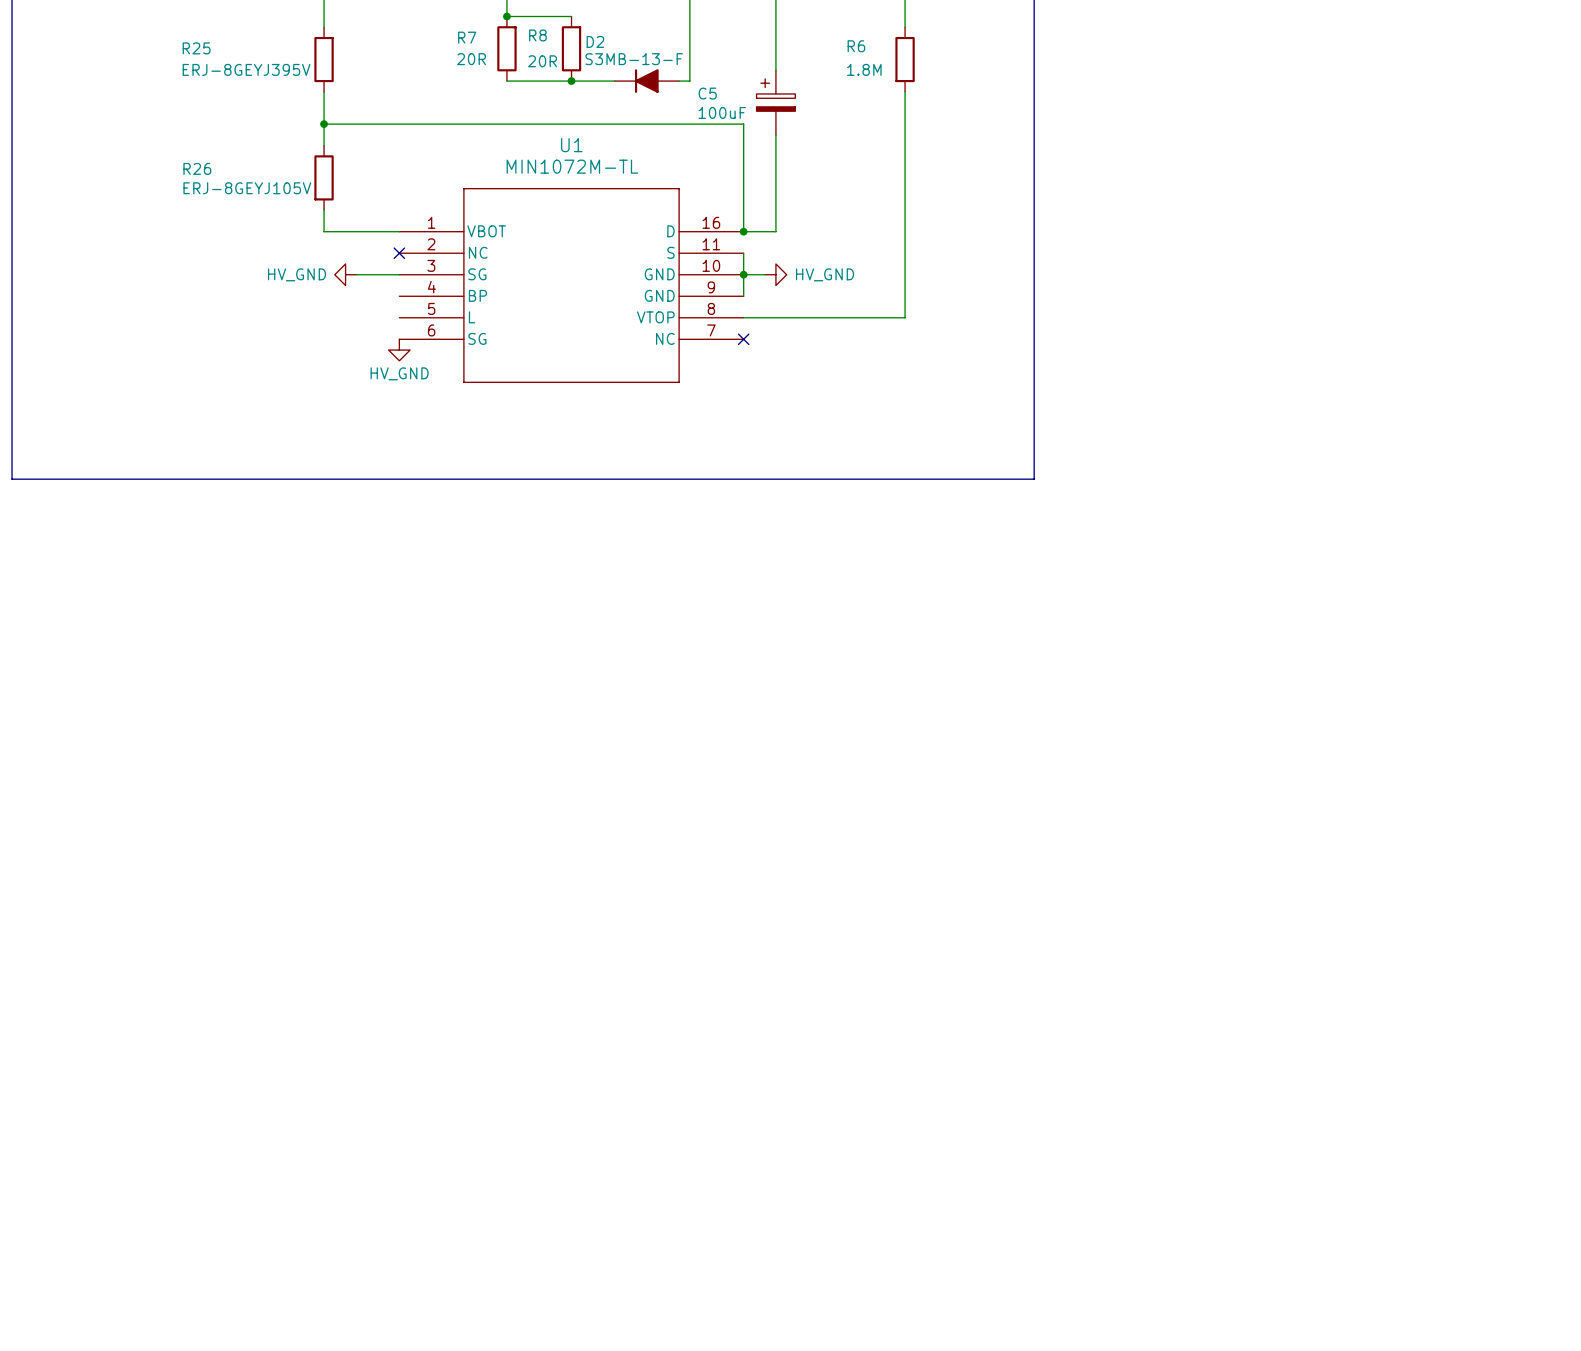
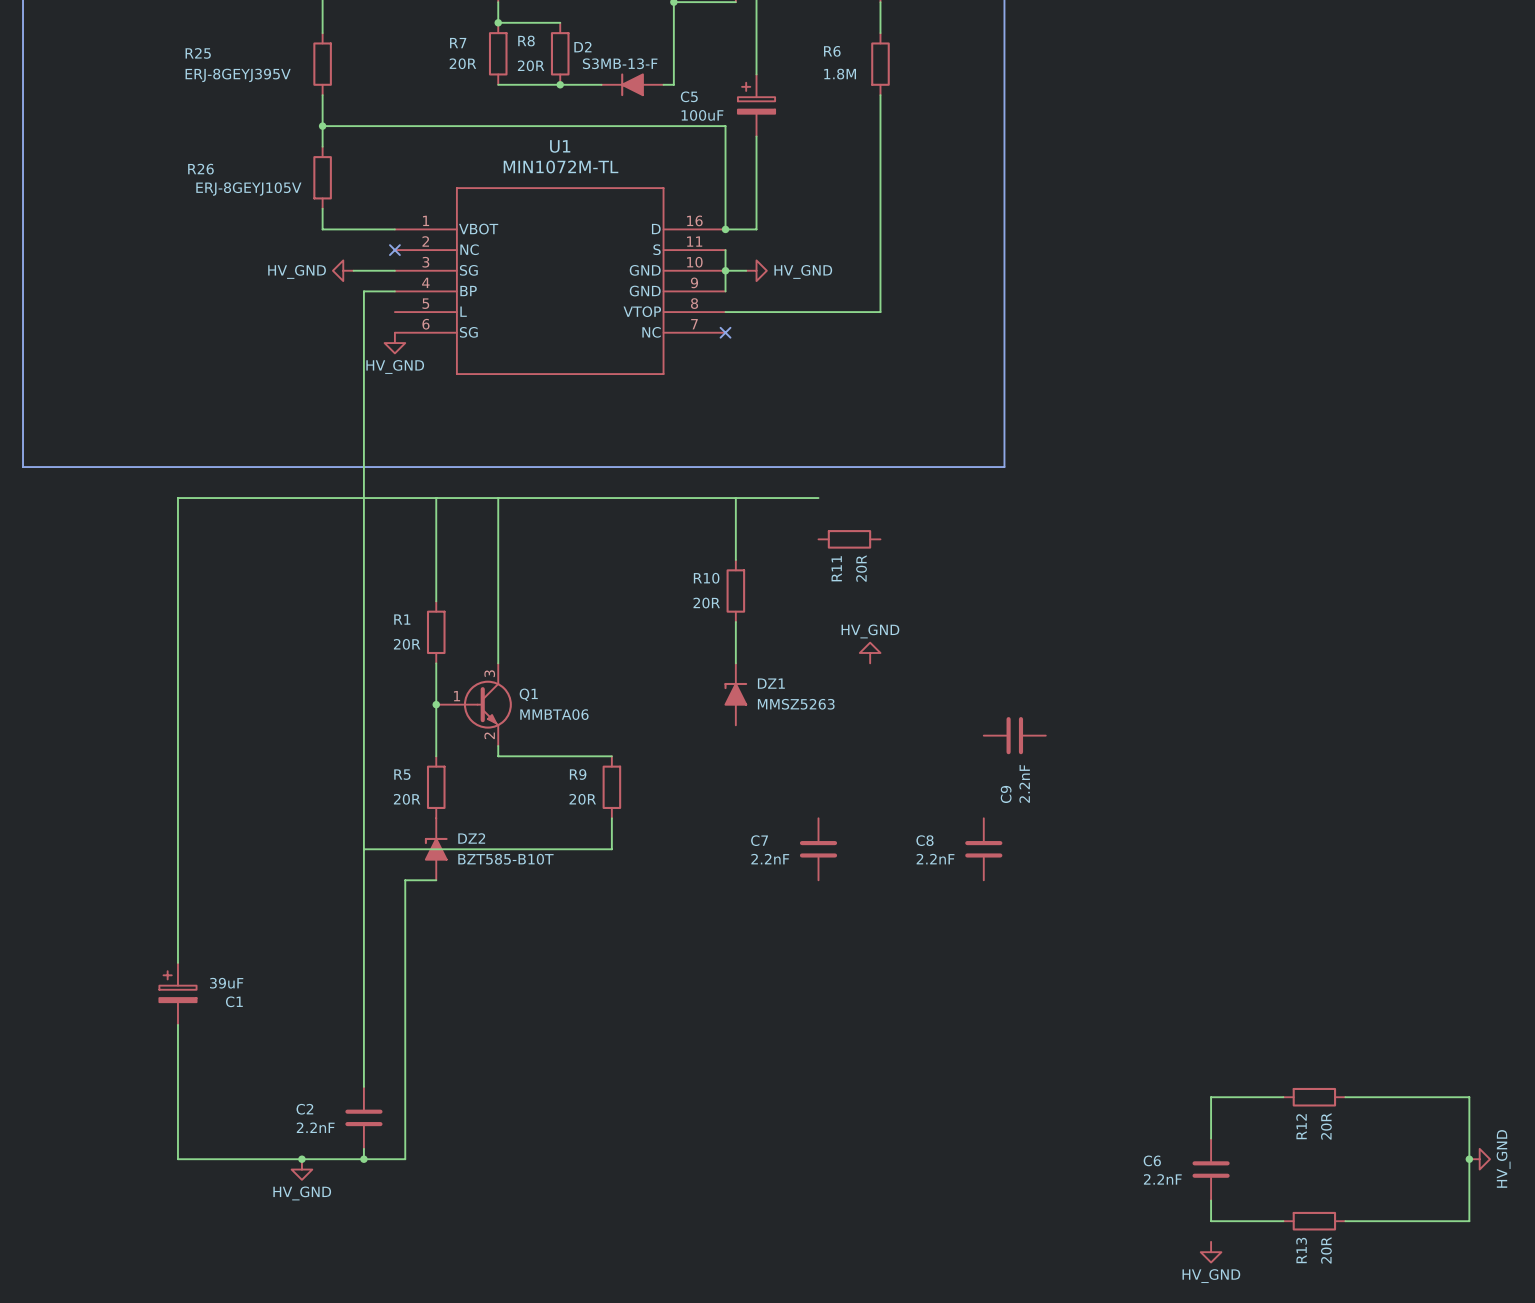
wire: none -> (394, 291) (363, 291) (363, 1086)
wire: none -> (436, 498) (436, 601)
wire: none -> (498, 498) (498, 663)
wire: none -> (735, 498) (735, 560)
wire: none -> (818, 498) (177, 498) (177, 962)
R11: none -> 20R (849, 539)
R10: none -> 20R (735, 591)
wire: none -> (735, 622) (735, 663)
R1: none -> 20R (436, 632)
power symbol: none -> HV_GND (870, 652)
wire: none -> (436, 663) (436, 756)
DZ1: none -> MMSZ5263 (735, 694)
junction: none -> (436, 704)
Q1: none -> MMBTA06 (474, 704)
C9: none -> 2.2nF (1014, 735)
wire: none -> (498, 745) (498, 756) (611, 756)
R5: none -> 20R (436, 787)
R9: none -> 20R (611, 787)
wire: none -> (611, 818) (611, 849) (363, 849)
DZ2: none -> BZT585-B10T (436, 849)
C7: none -> 2.2nF (818, 849)
C8: none -> 2.2nF (983, 849)
wire: none -> (436, 880) (405, 880) (405, 1159) (177, 1159) (177, 1024)
C1: none -> 39uF (177, 993)
wire: none -> (1283, 1097) (1211, 1097) (1211, 1138)
R12: none -> 20R (1314, 1097)
wire: none -> (1345, 1097) (1469, 1097) (1469, 1221) (1345, 1221)
C2: none -> 2.2nF (363, 1117)
wire: none -> (363, 1148) (363, 1159)
junction: none -> (301, 1159)
junction: none -> (363, 1159)
junction: none -> (1469, 1159)
power symbol: none -> HV_GND (1479, 1159)
power symbol: none -> HV_GND (301, 1169)
C6: none -> 2.2nF (1211, 1169)
wire: none -> (1211, 1200) (1211, 1221) (1283, 1221)
R13: none -> 20R (1314, 1221)
power symbol: none -> HV_GND (1211, 1252)

